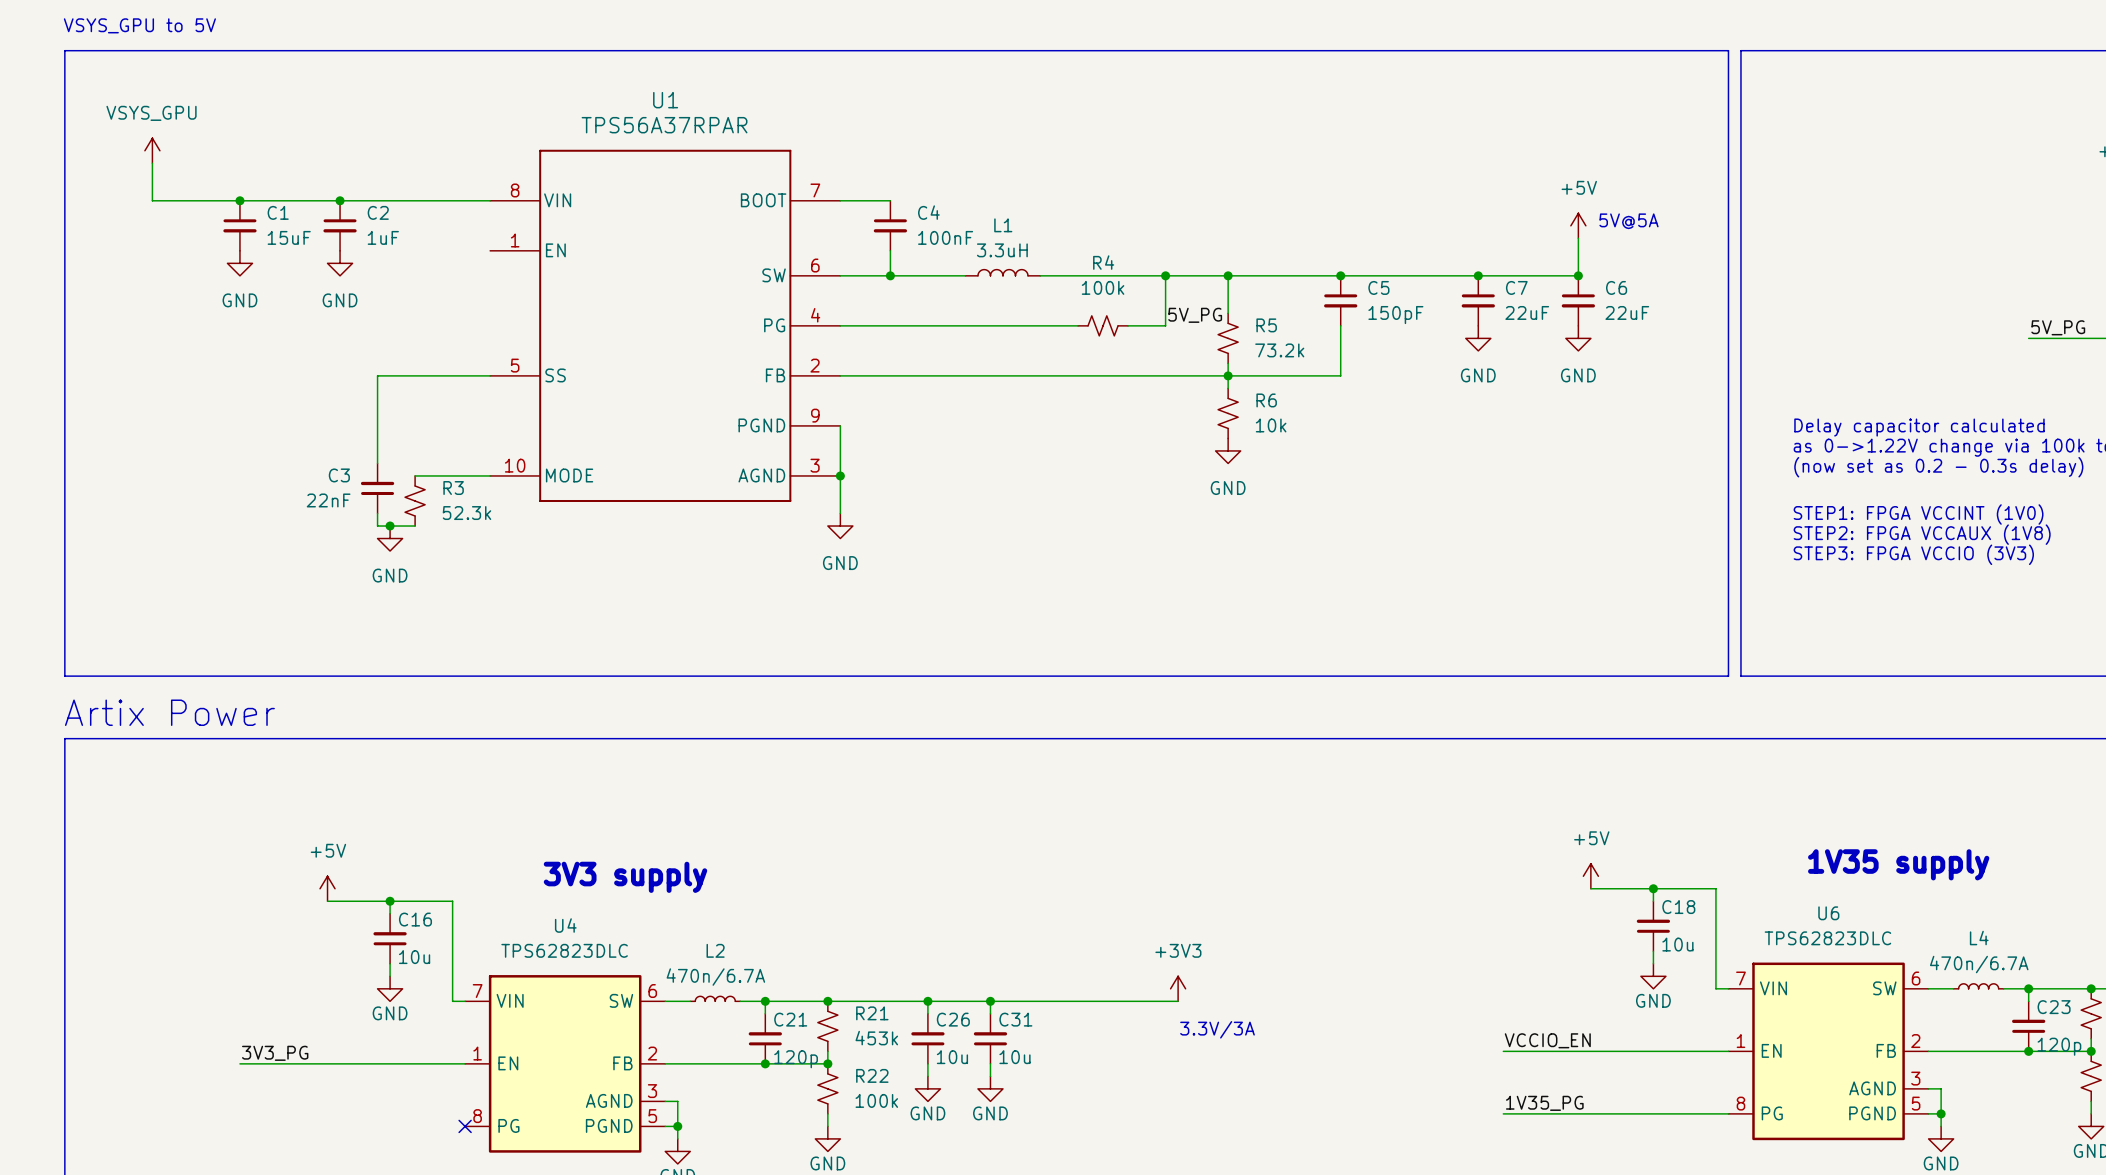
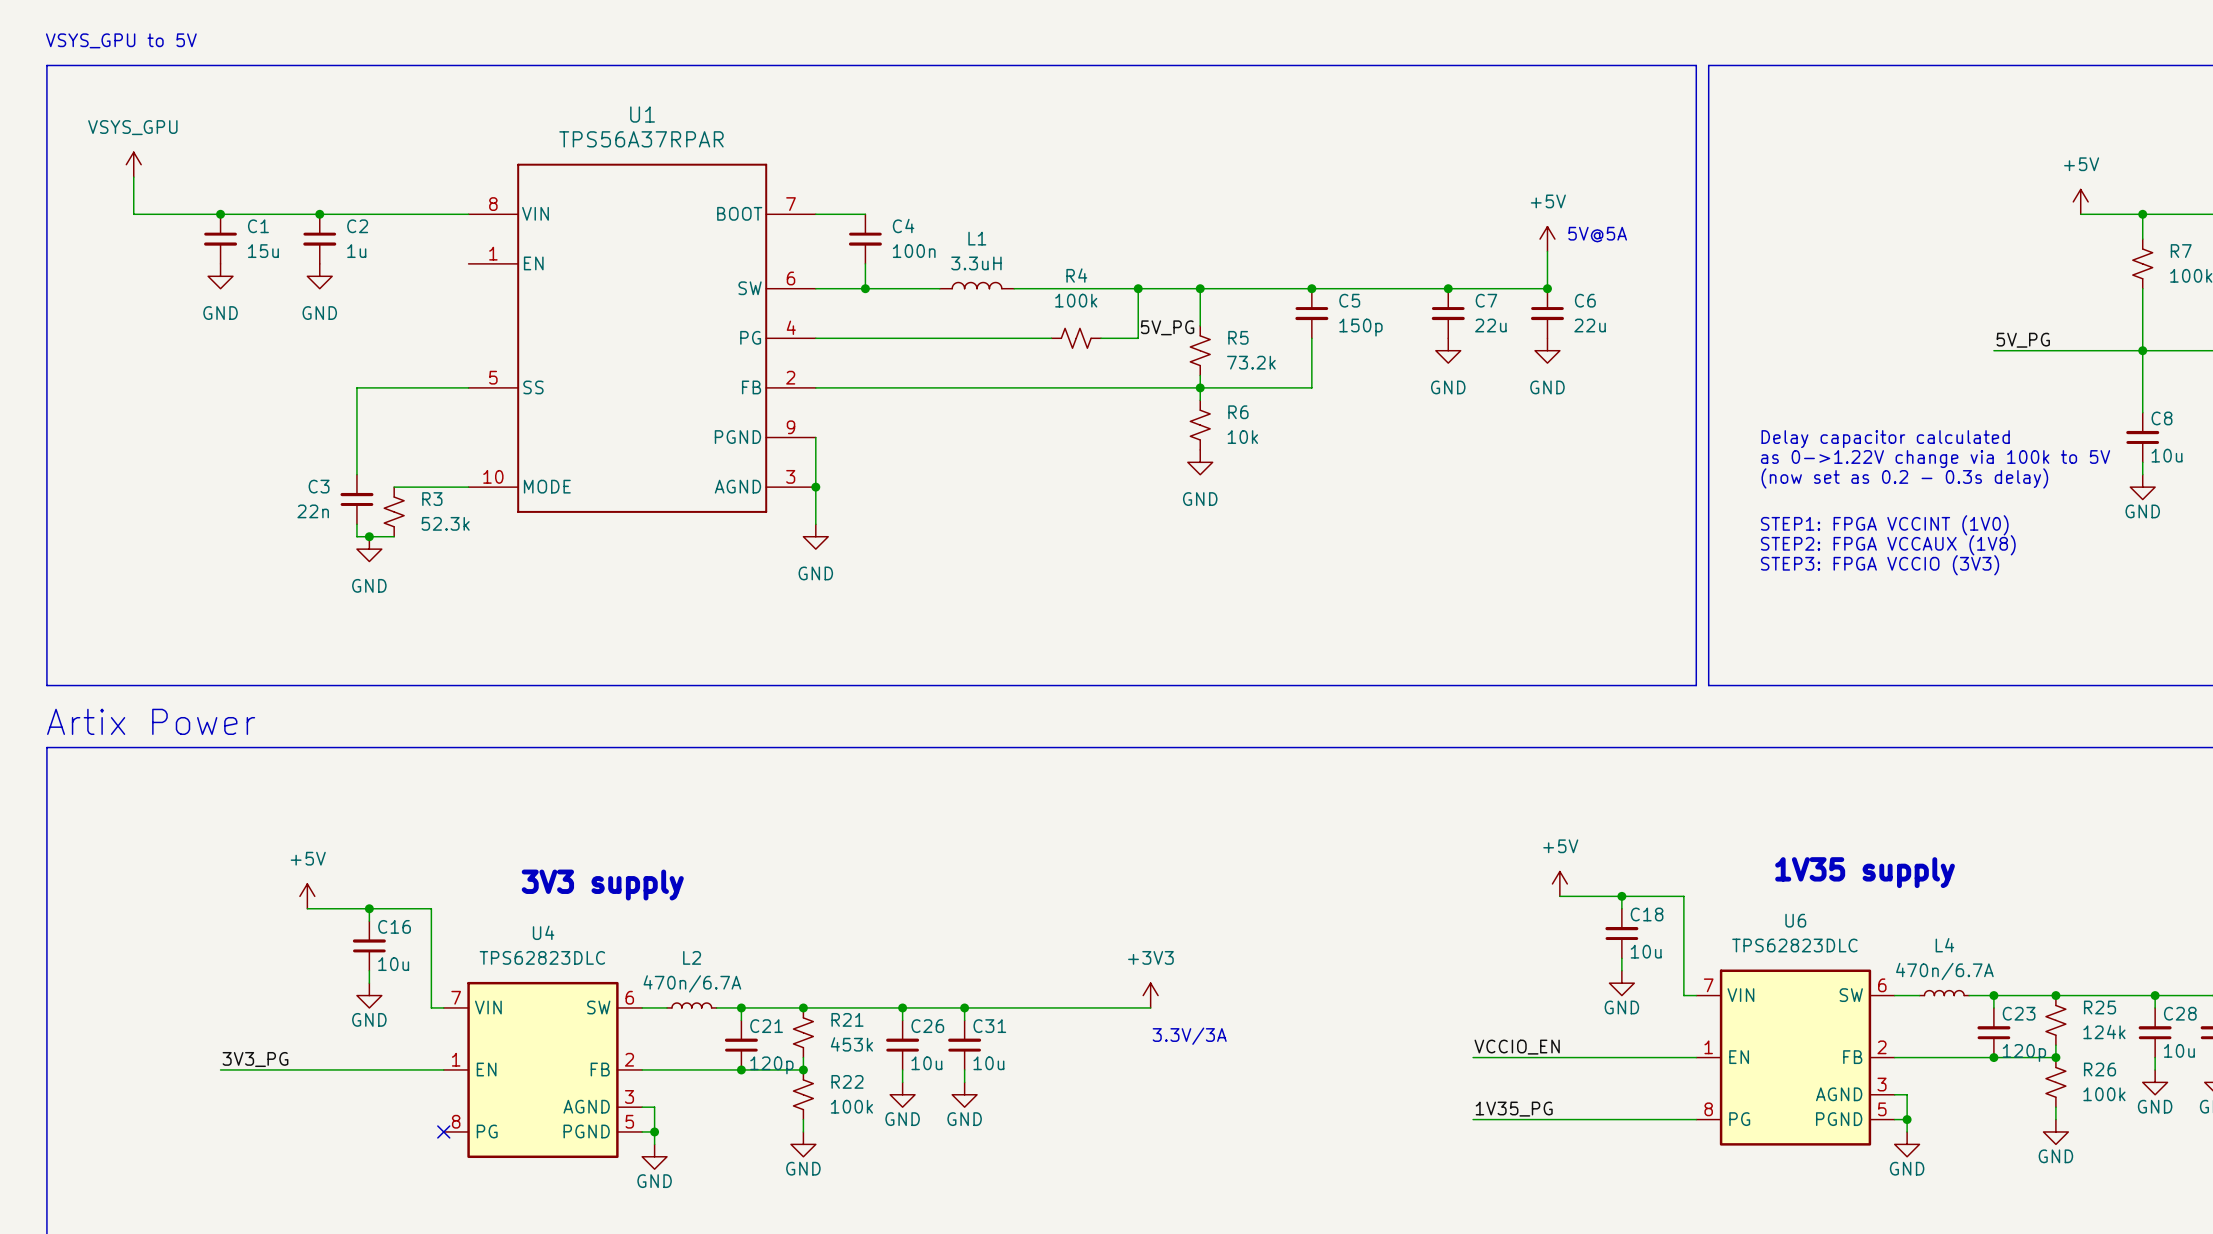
C1 value: 15uF (289, 237) -> 15u (263, 251)
C2 value: 1uF (383, 237) -> 1u (356, 251)
C4 value: 100nF (945, 237) -> 100n (914, 251)
C7 value: 22uF (1527, 312) -> 22u (1490, 325)
C6 value: 22uF (1627, 312) -> 22u (1590, 325)
C5 value: 150pF (1395, 315) -> 150p (1360, 327)
C3 value: 22nF (328, 500) -> 22n (313, 511)

